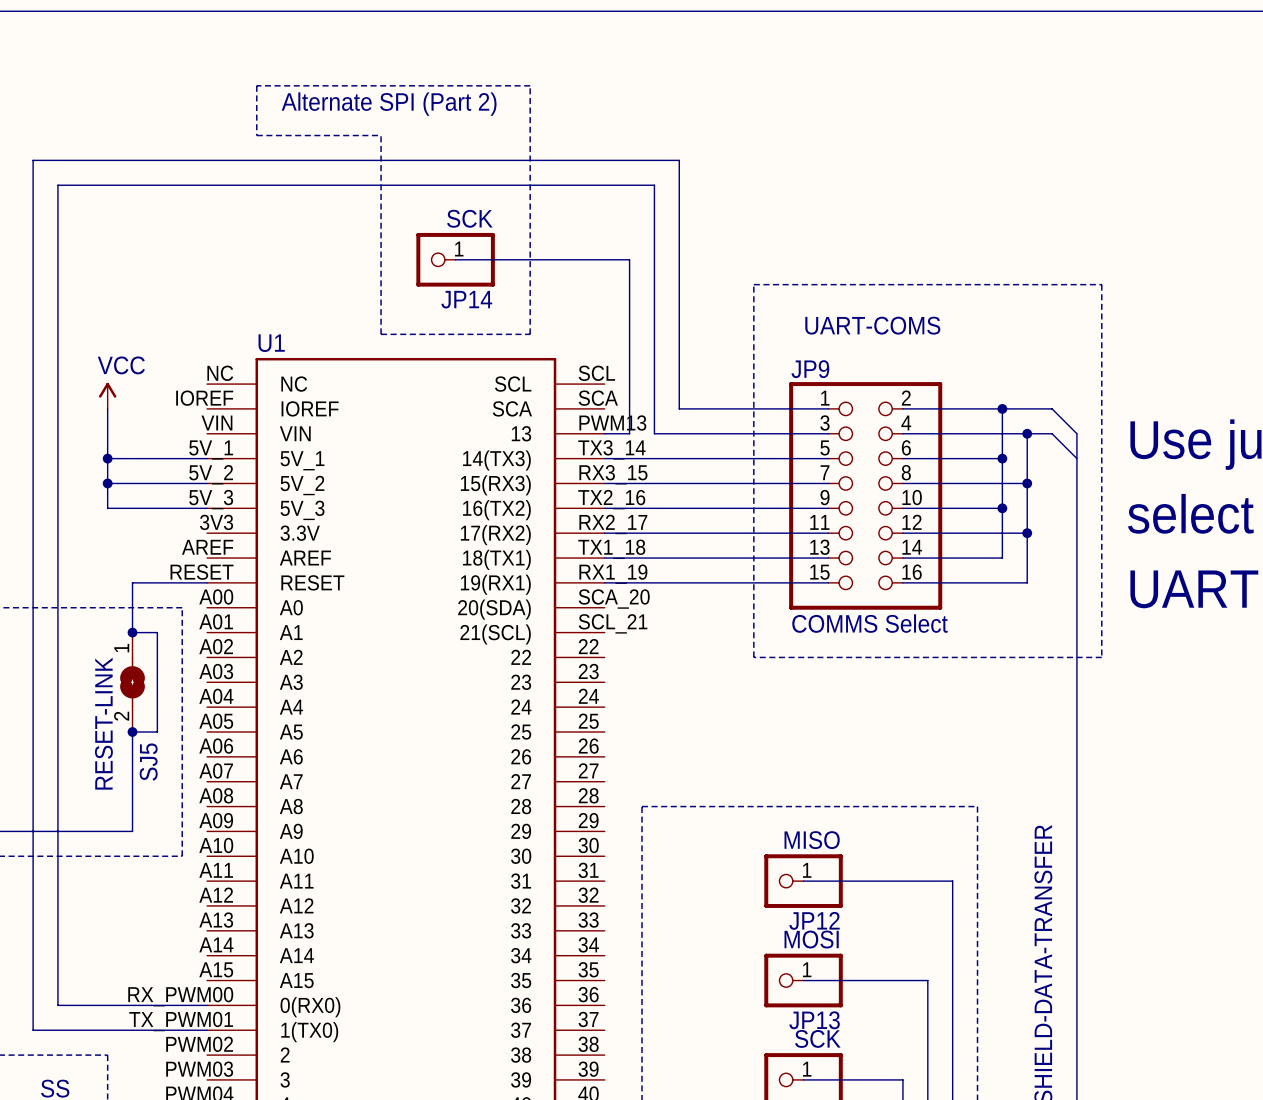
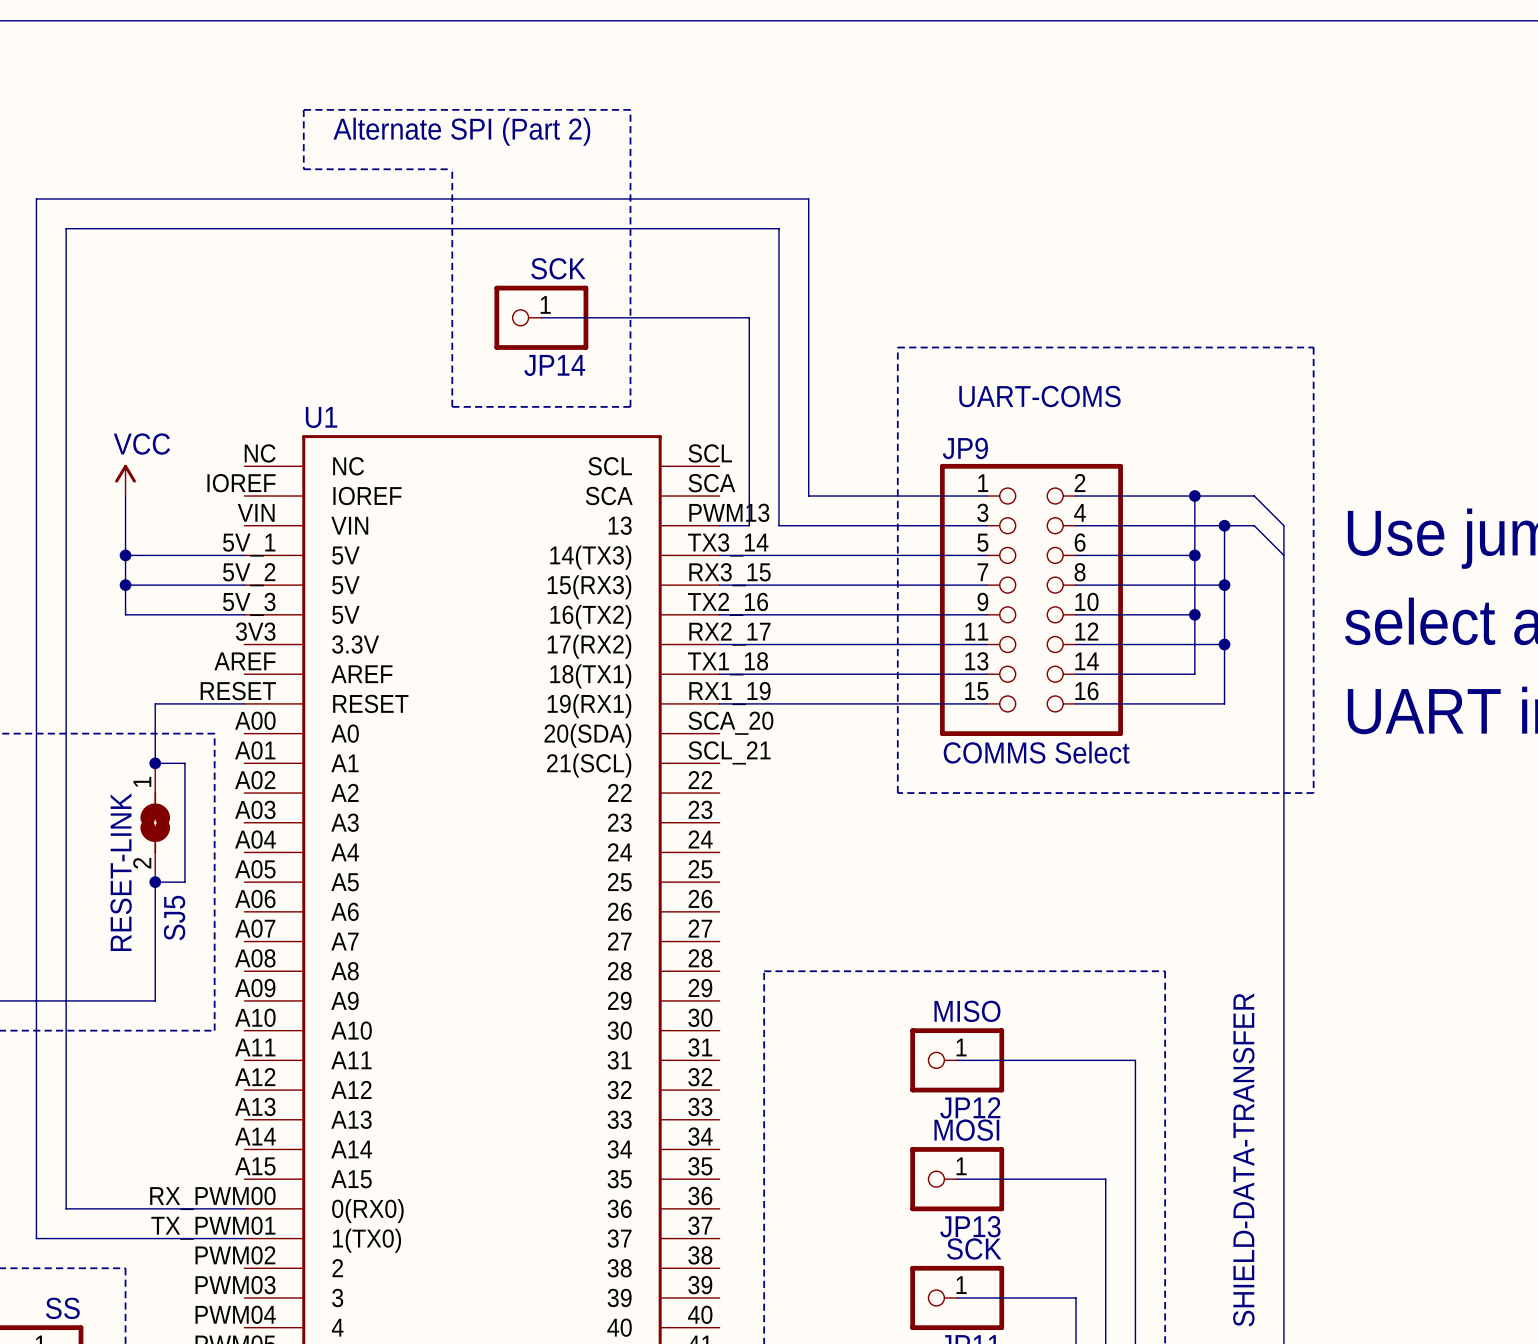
U1 pin name: 5V_1 (302, 460) -> 5V (345, 555)
U1 pin name: 5V_2 (302, 485) -> 5V (345, 585)
U1 pin name: 5V_3 (302, 510) -> 5V (345, 614)

